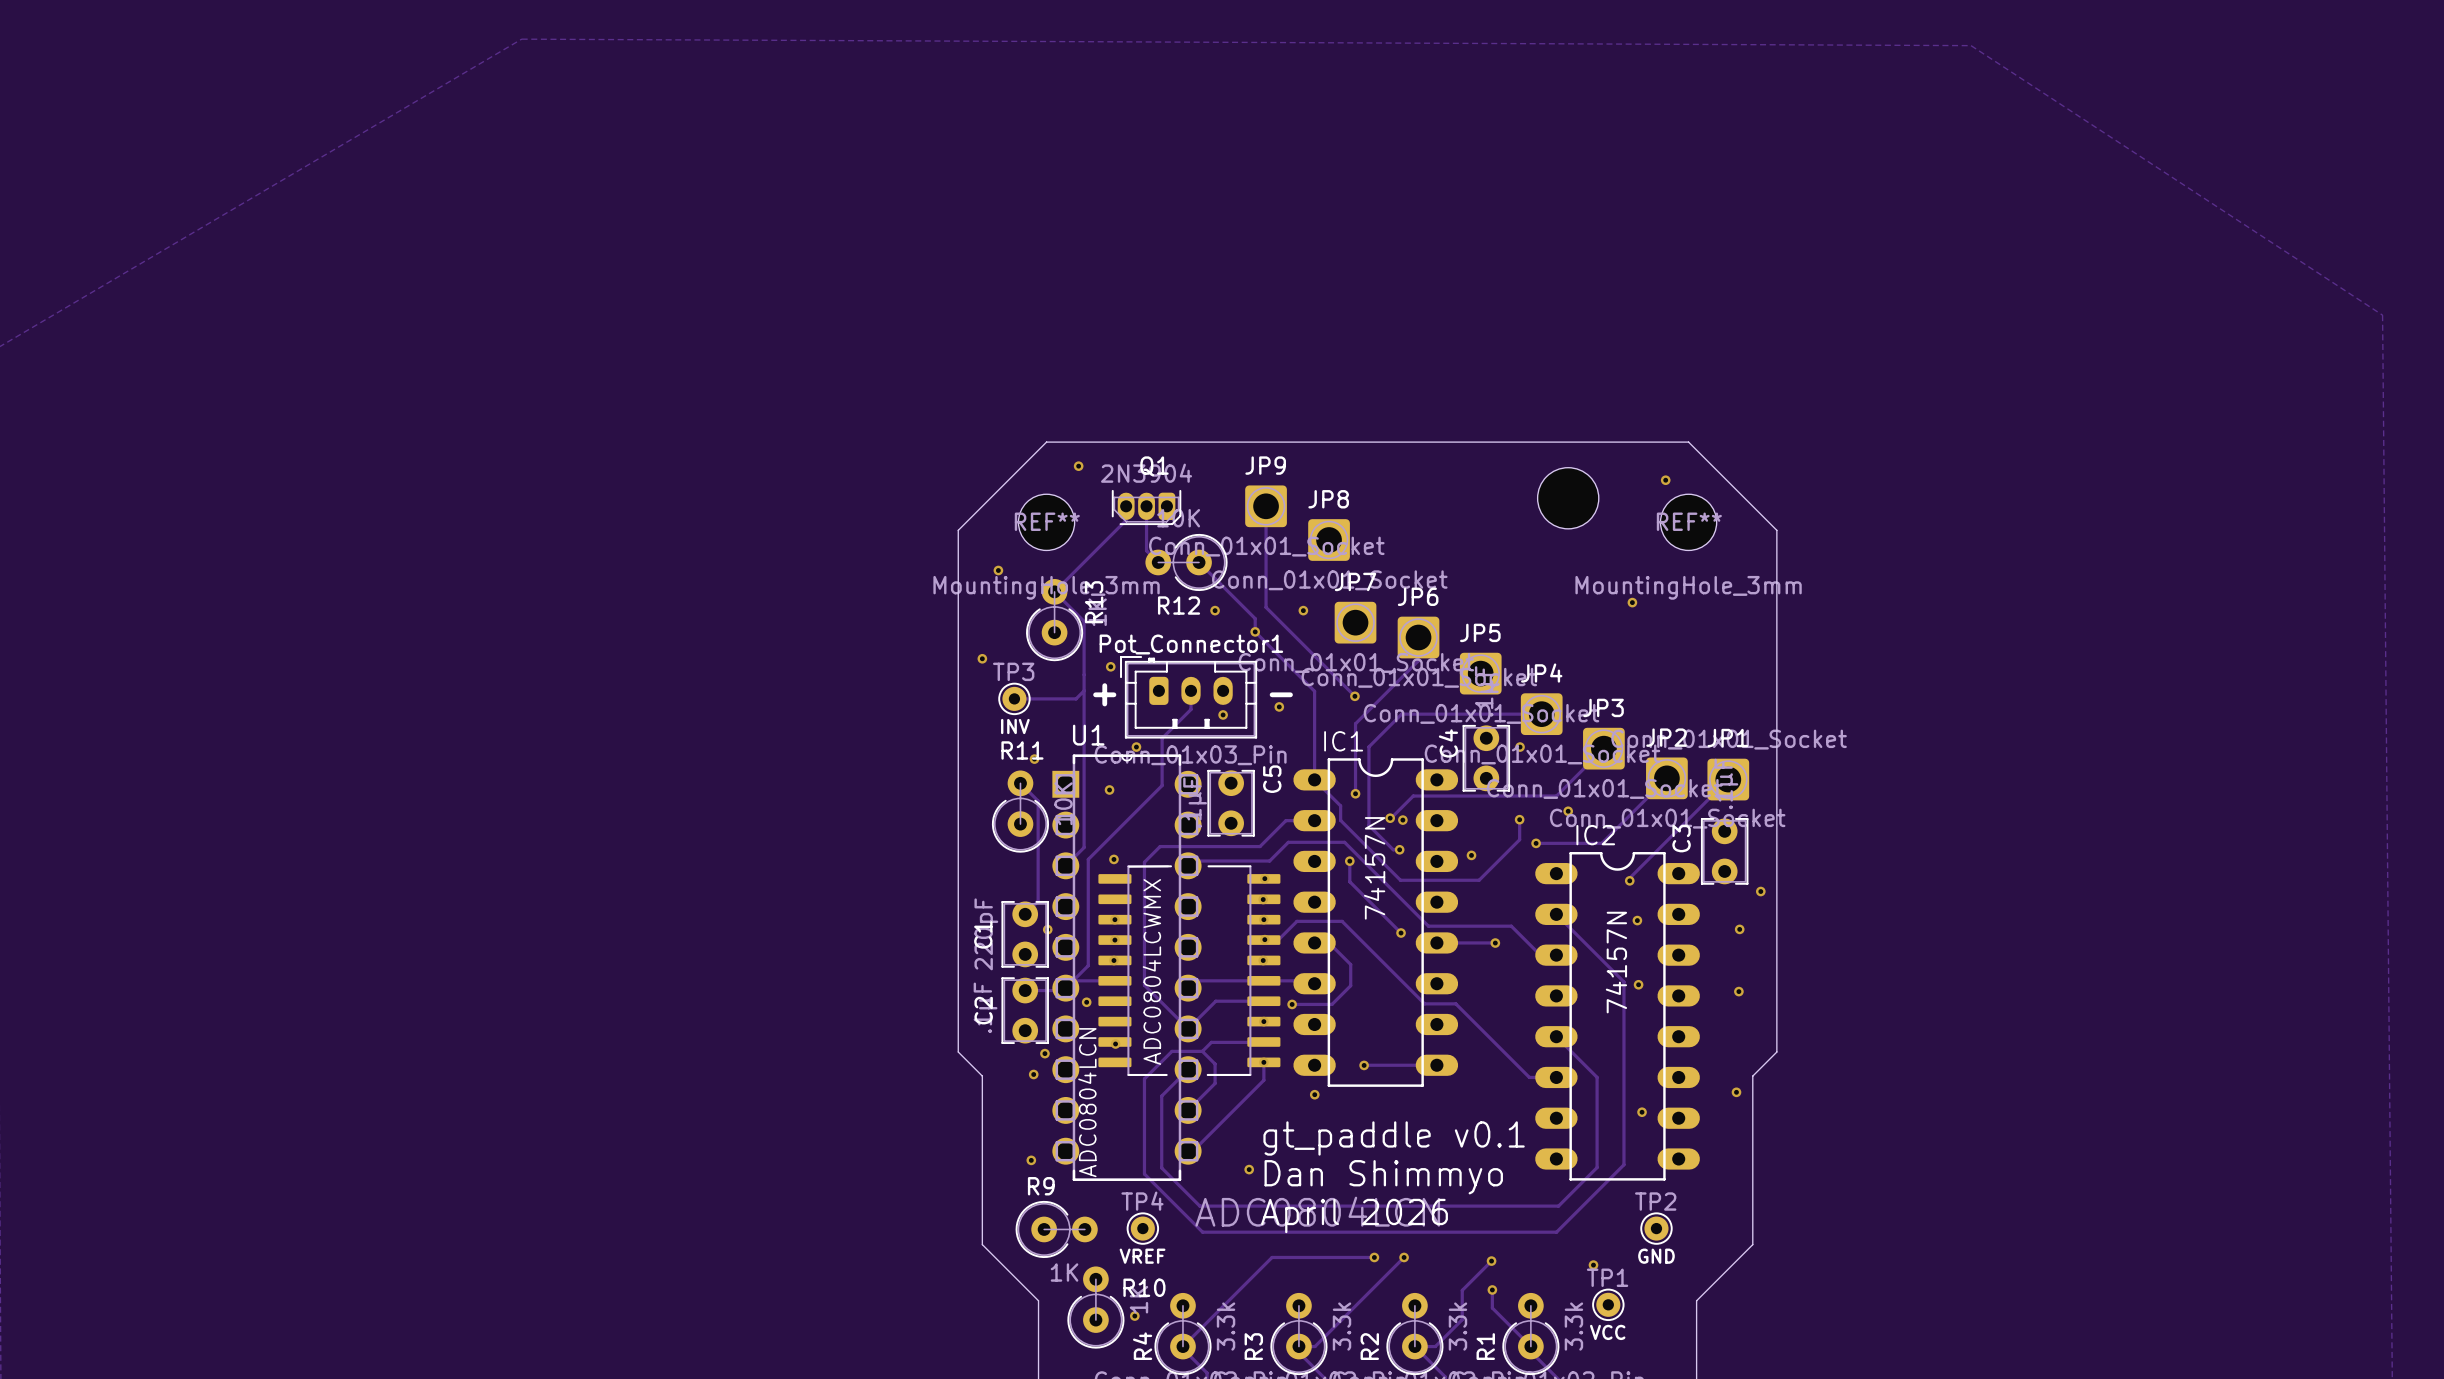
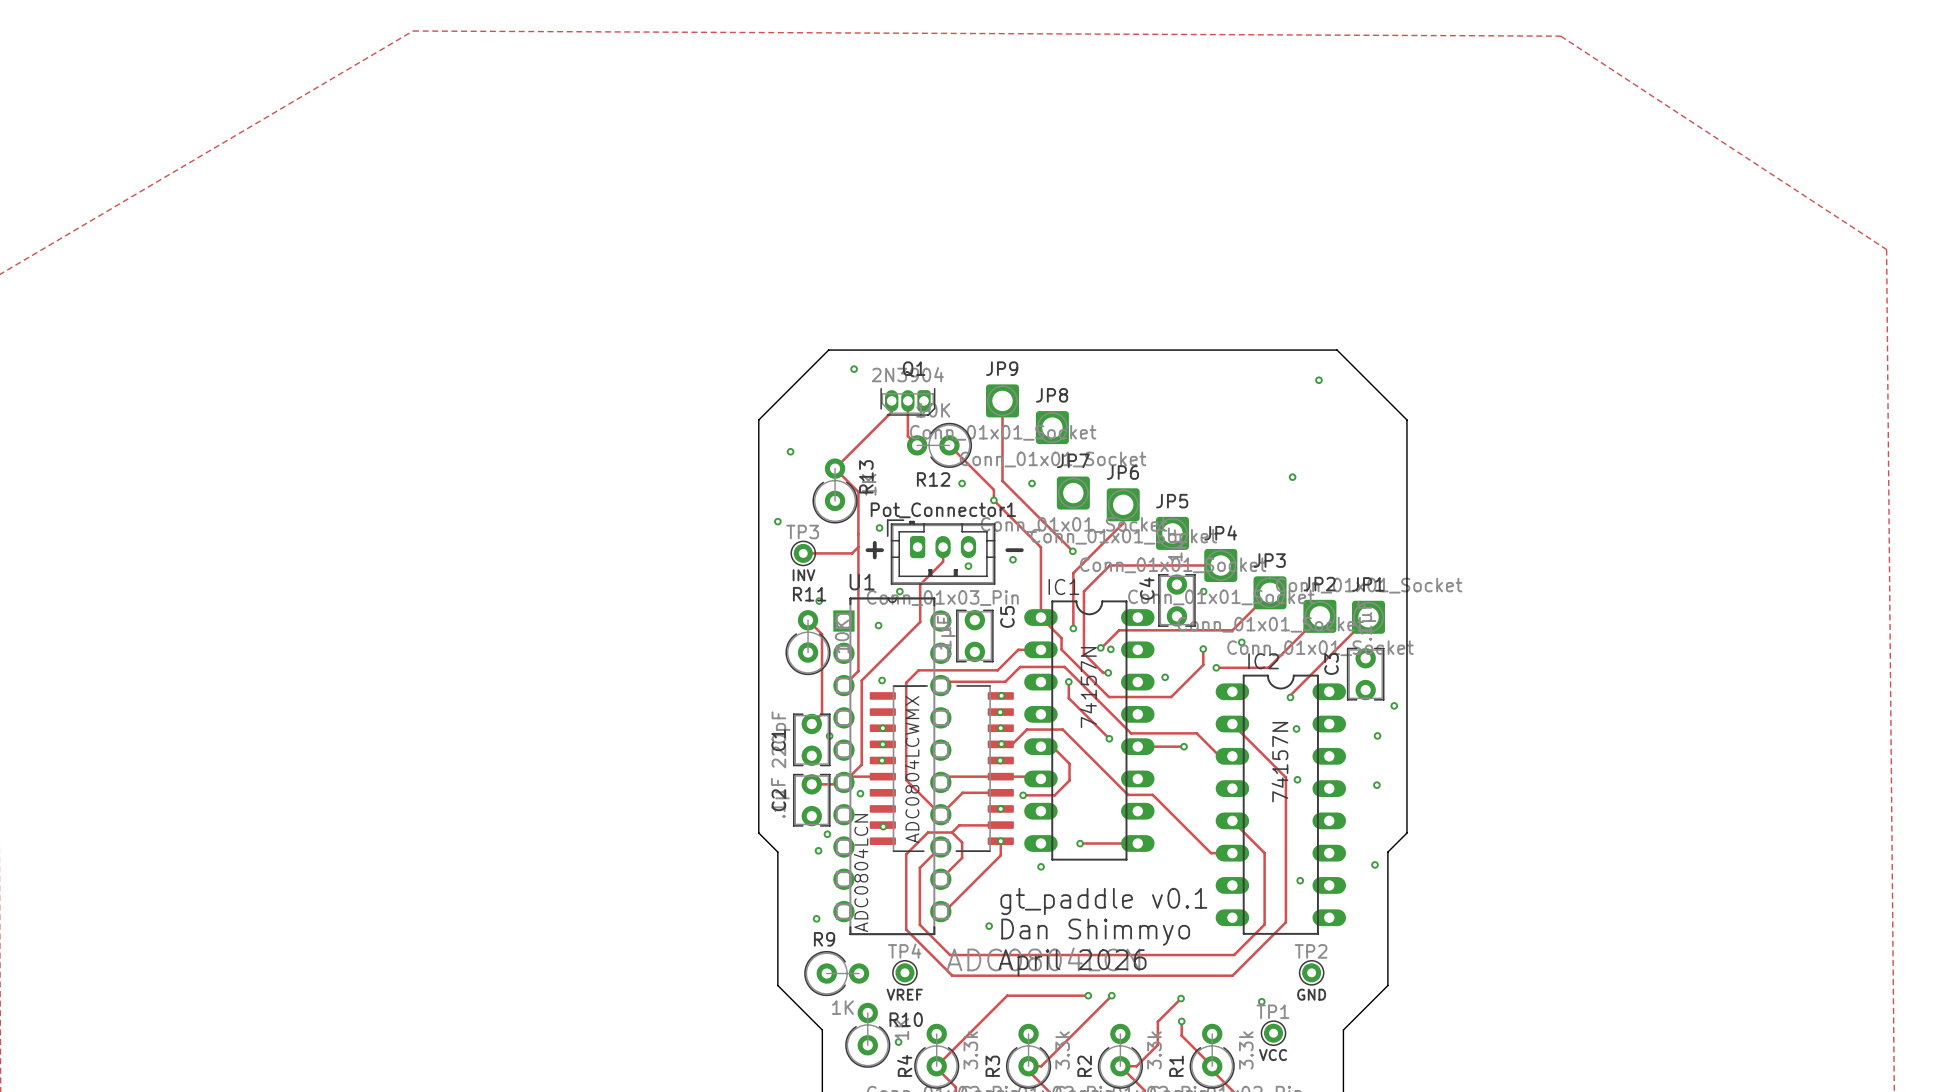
part: (1568, 498) -> none
REF**: MountingHole_3mm (1046, 522) -> none
REF**: MountingHole_3mm (1688, 522) -> none

